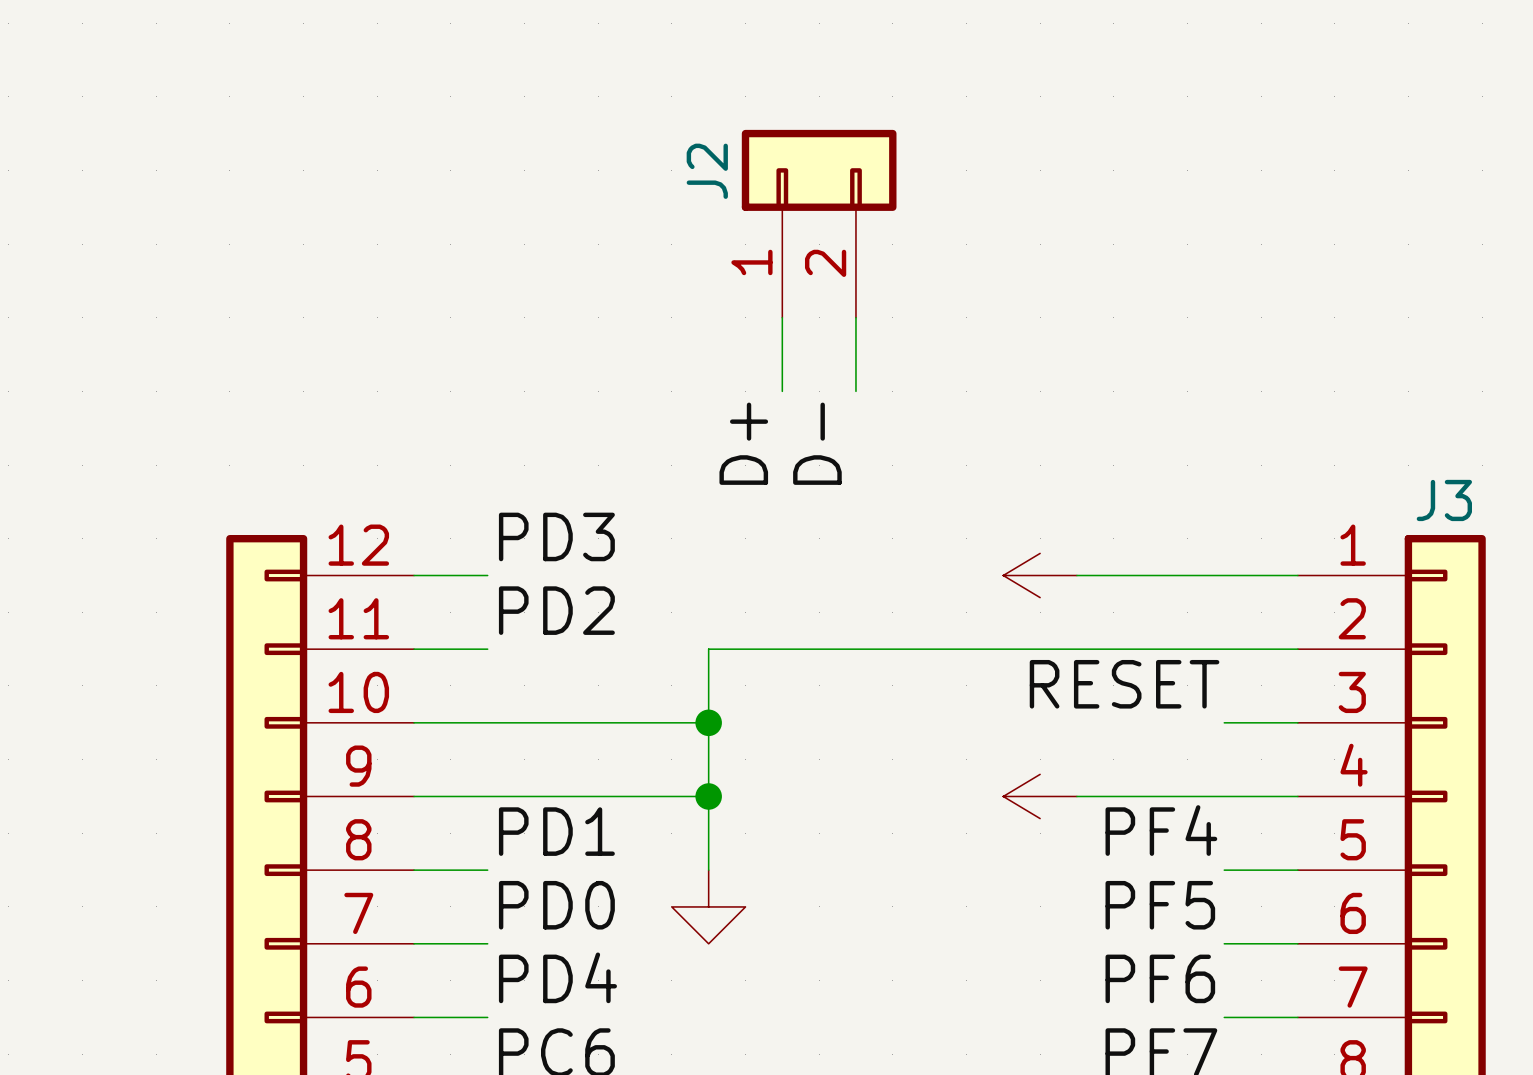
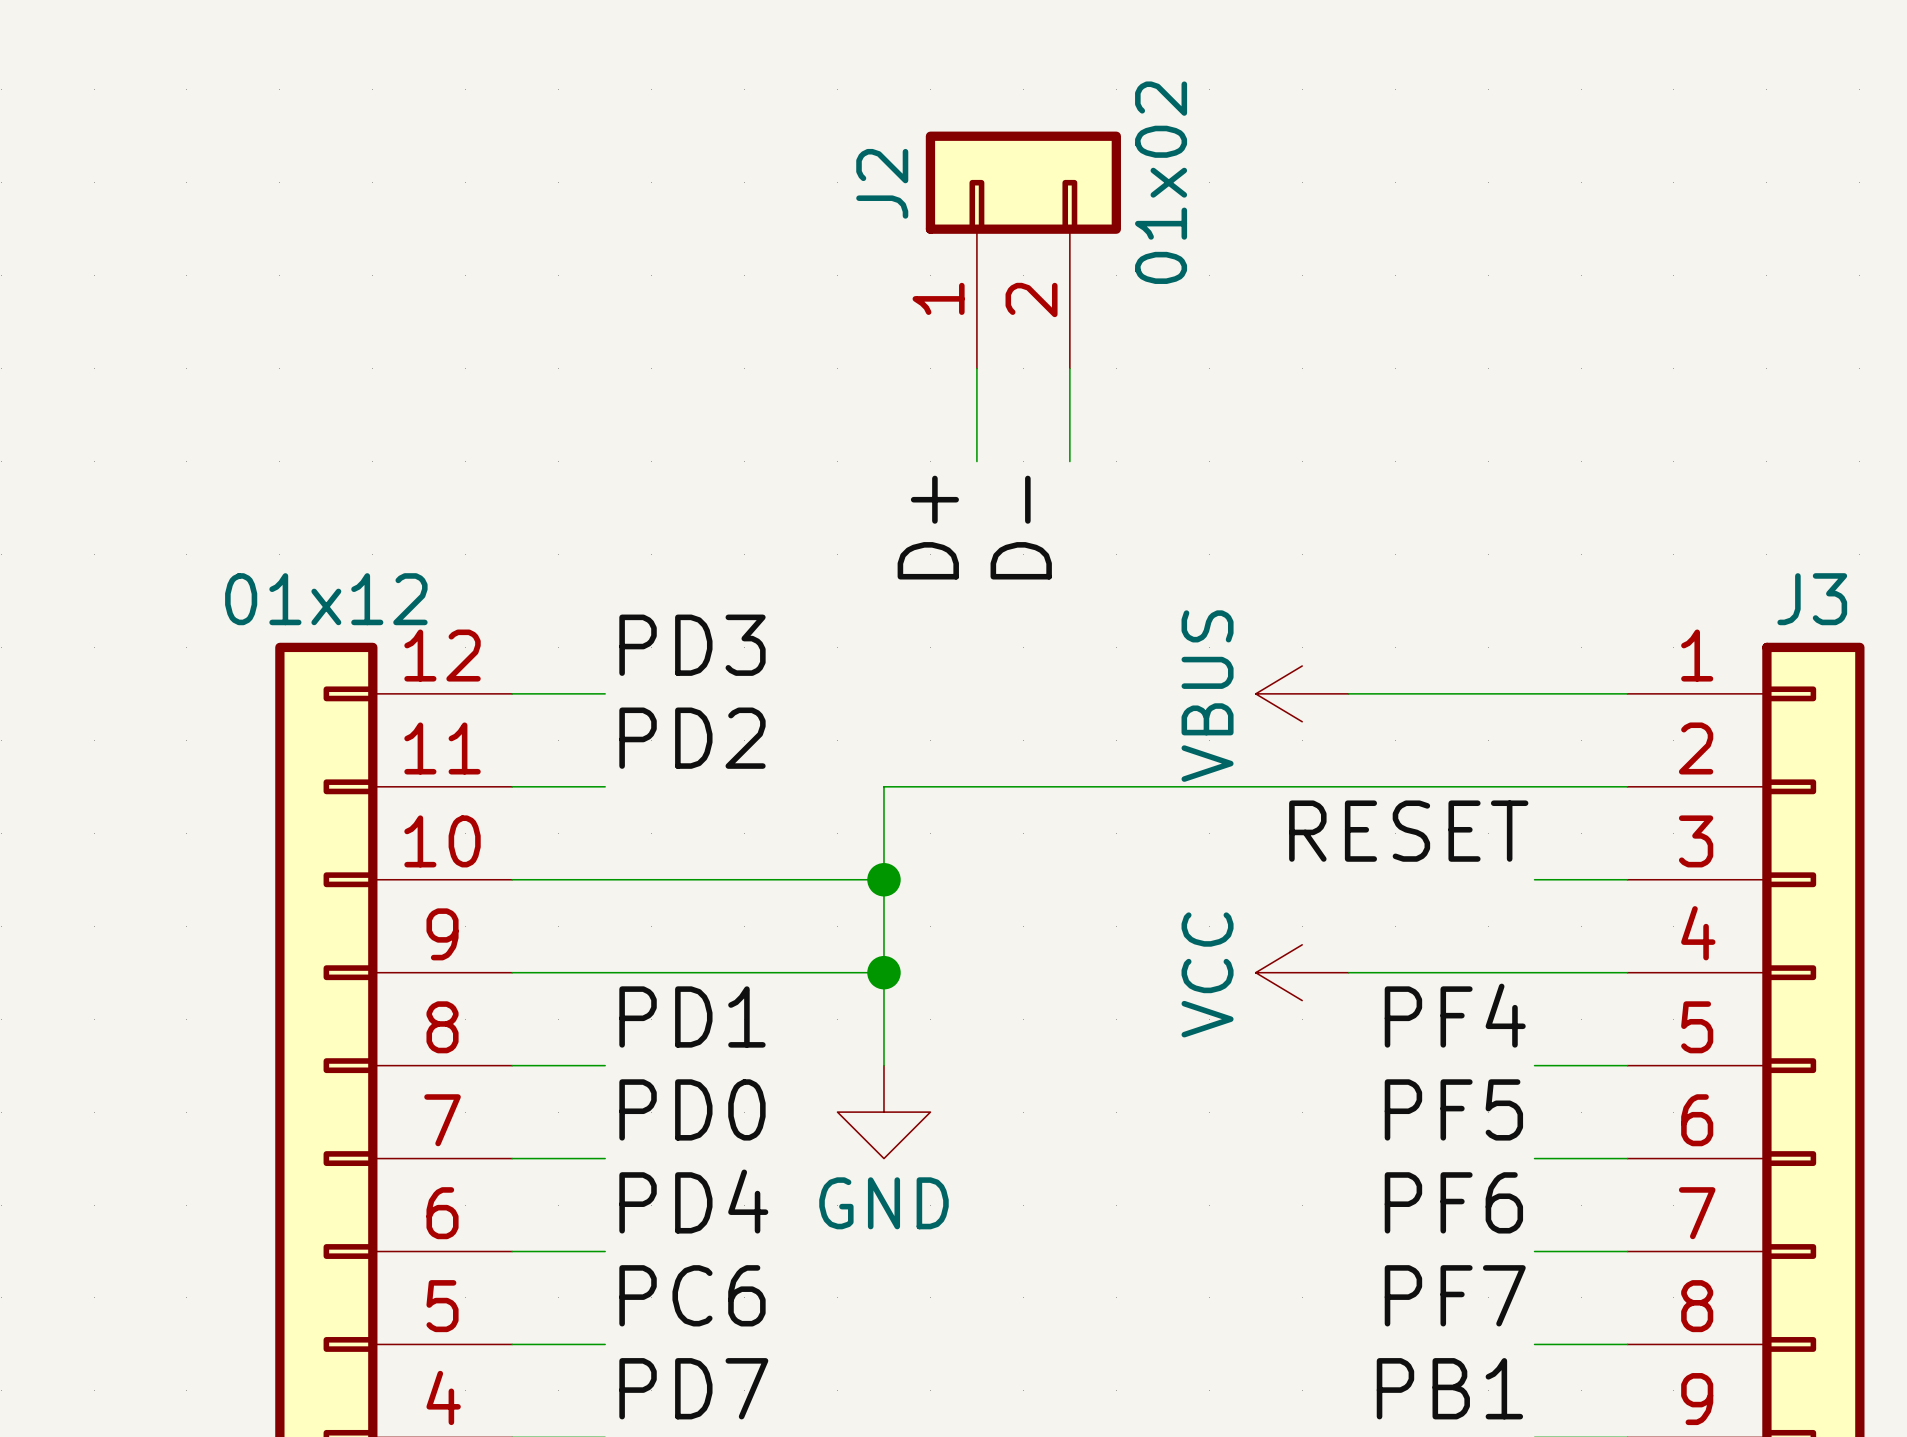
J2 value: none -> 01x02 (1161, 182)
part value: none -> 01x12 (326, 599)
power symbol text: none -> VBUS (1207, 696)
power symbol text: none -> VCC (1207, 974)
power symbol text: none -> GND (883, 1203)

